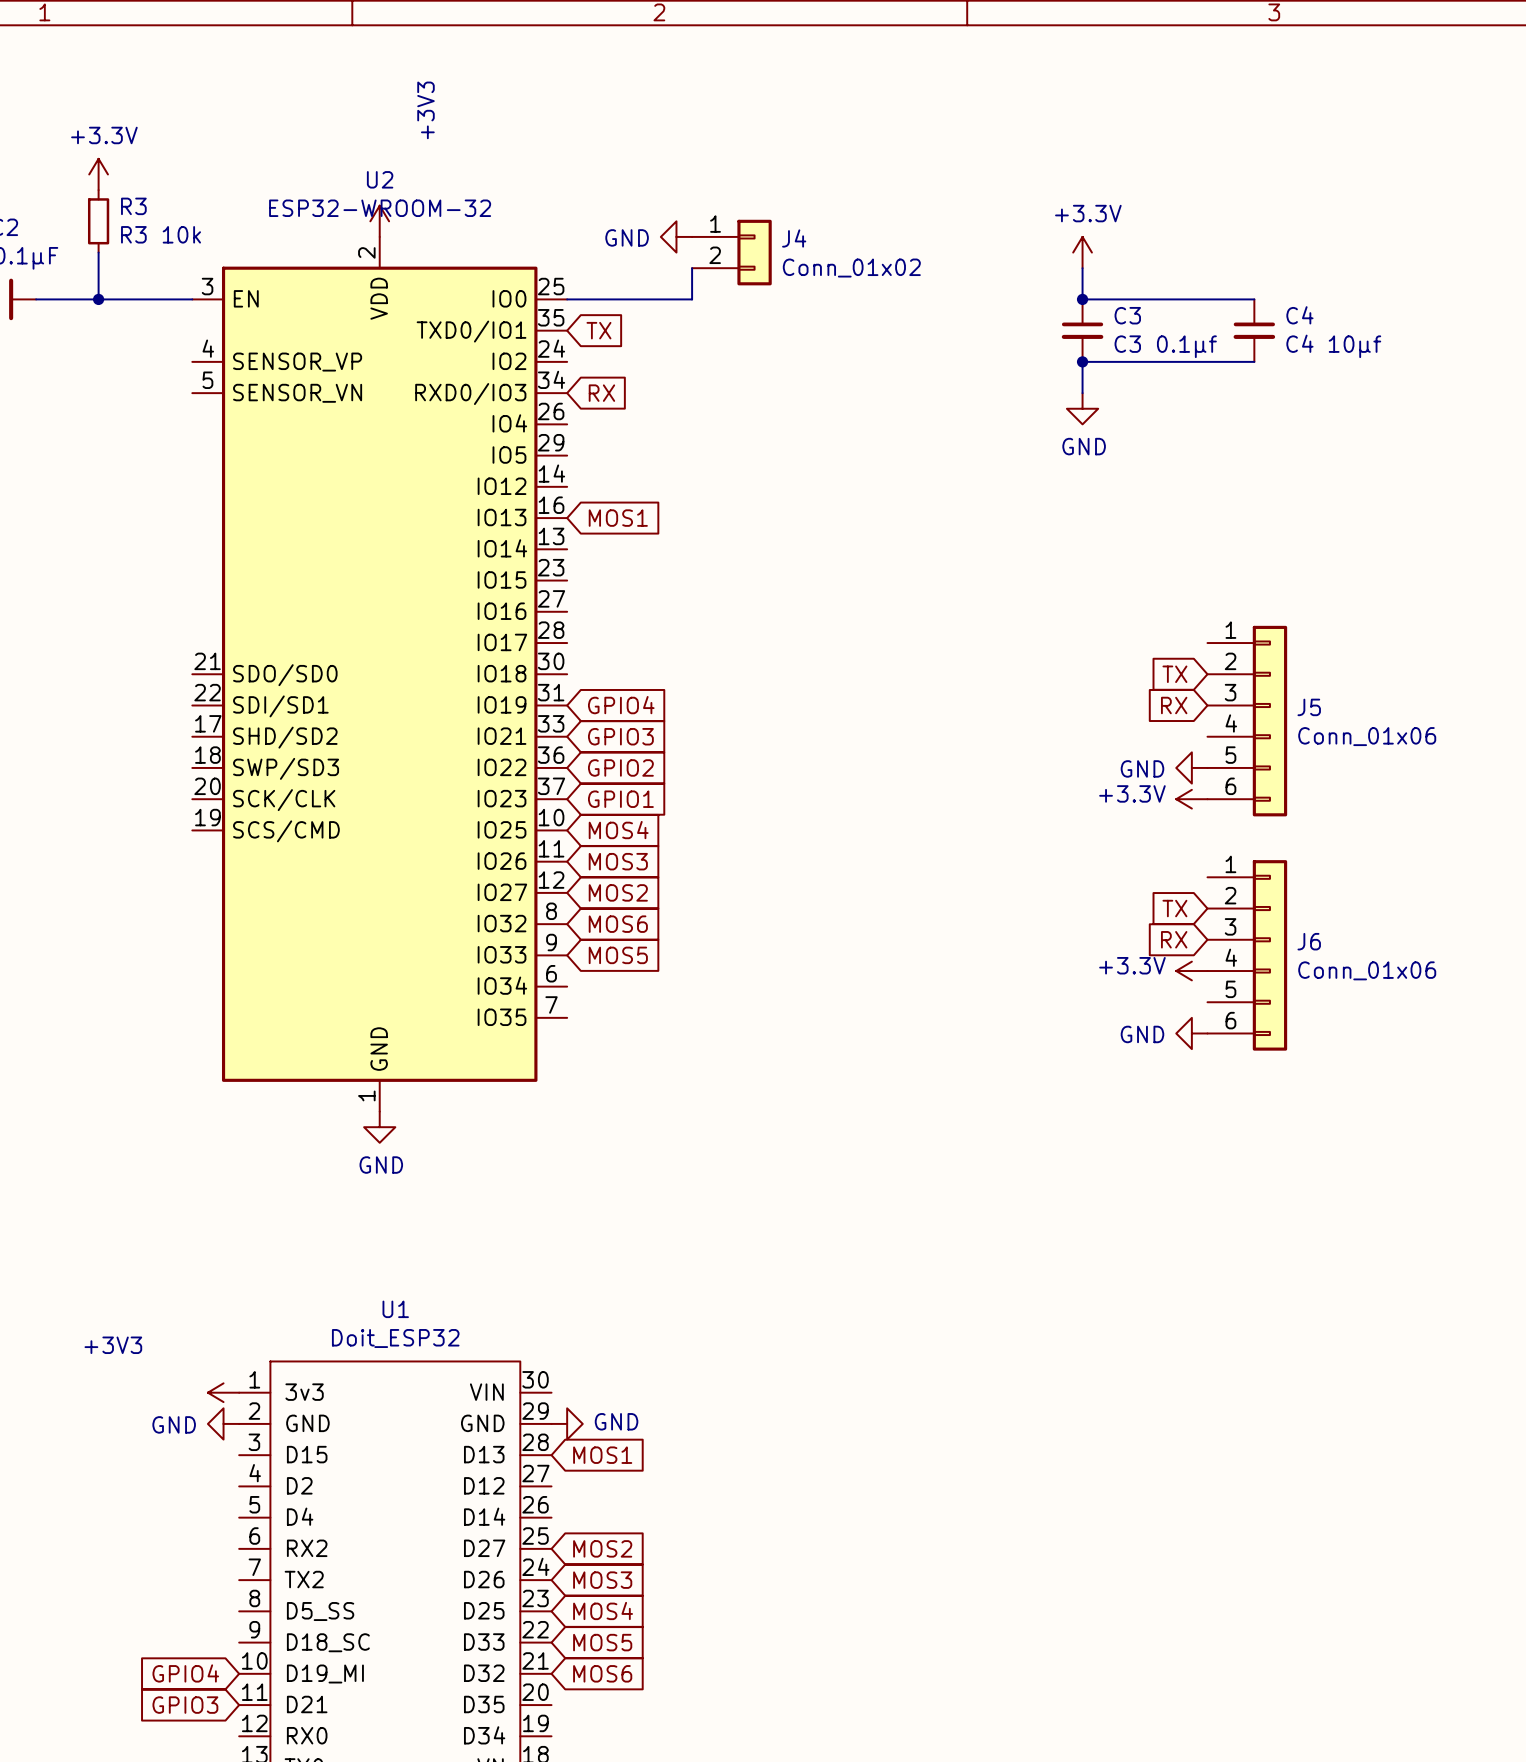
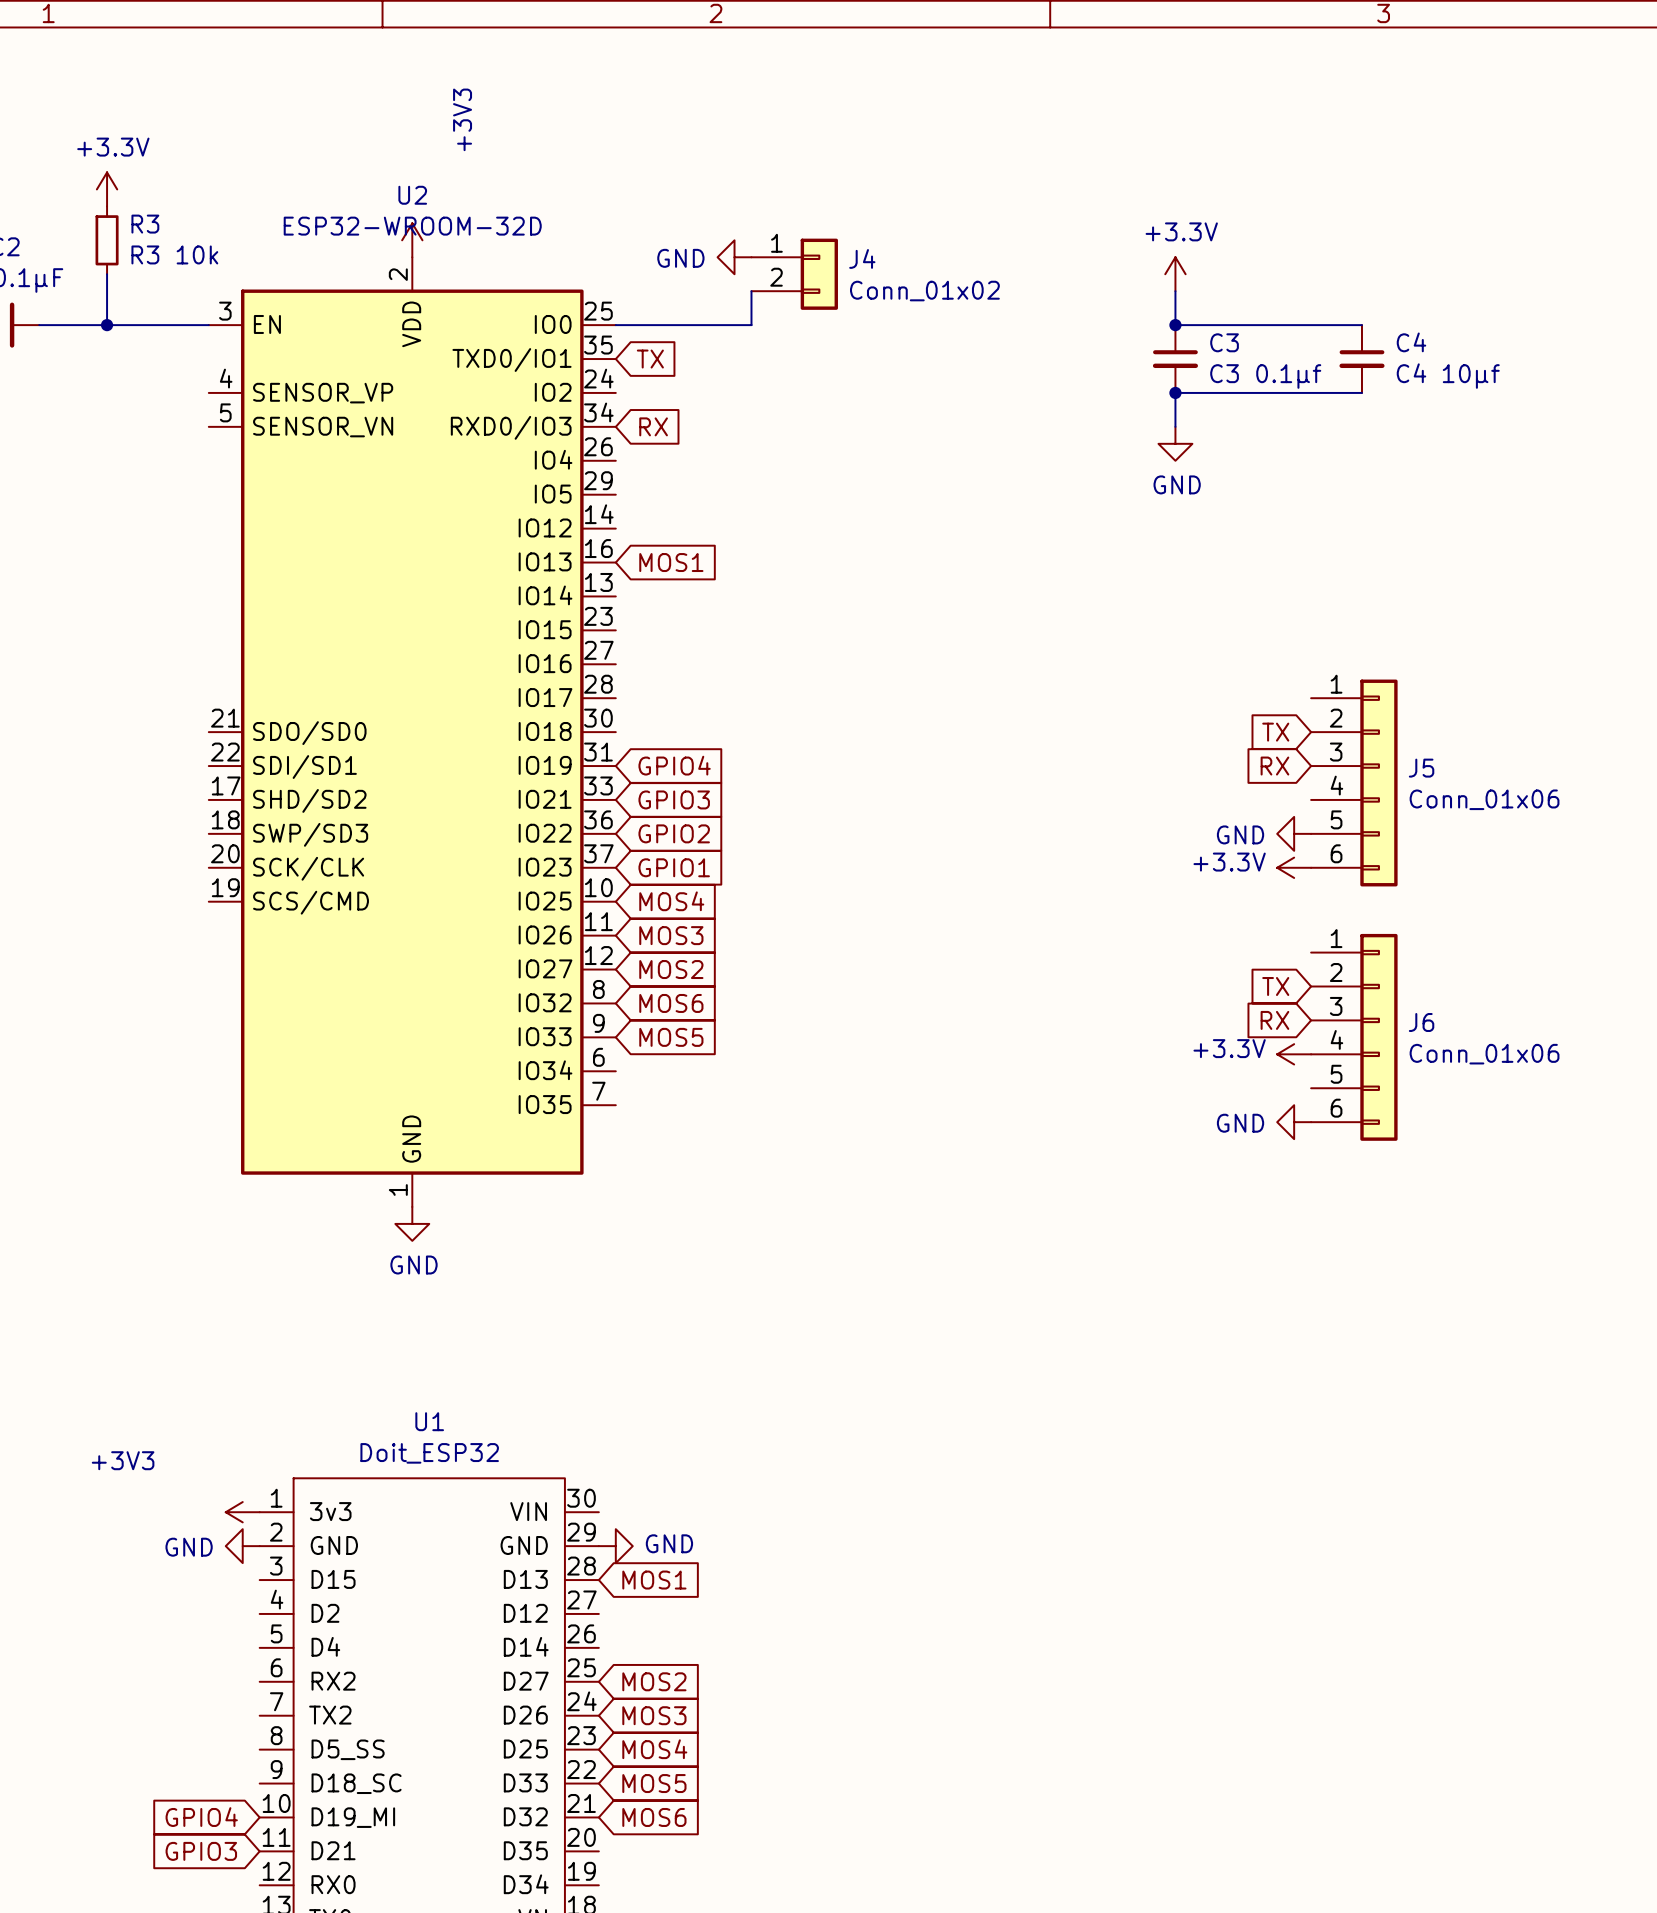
U2 value: ESP32-WROOM-32 (380, 208) -> ESP32-WROOM-32D (412, 226)

